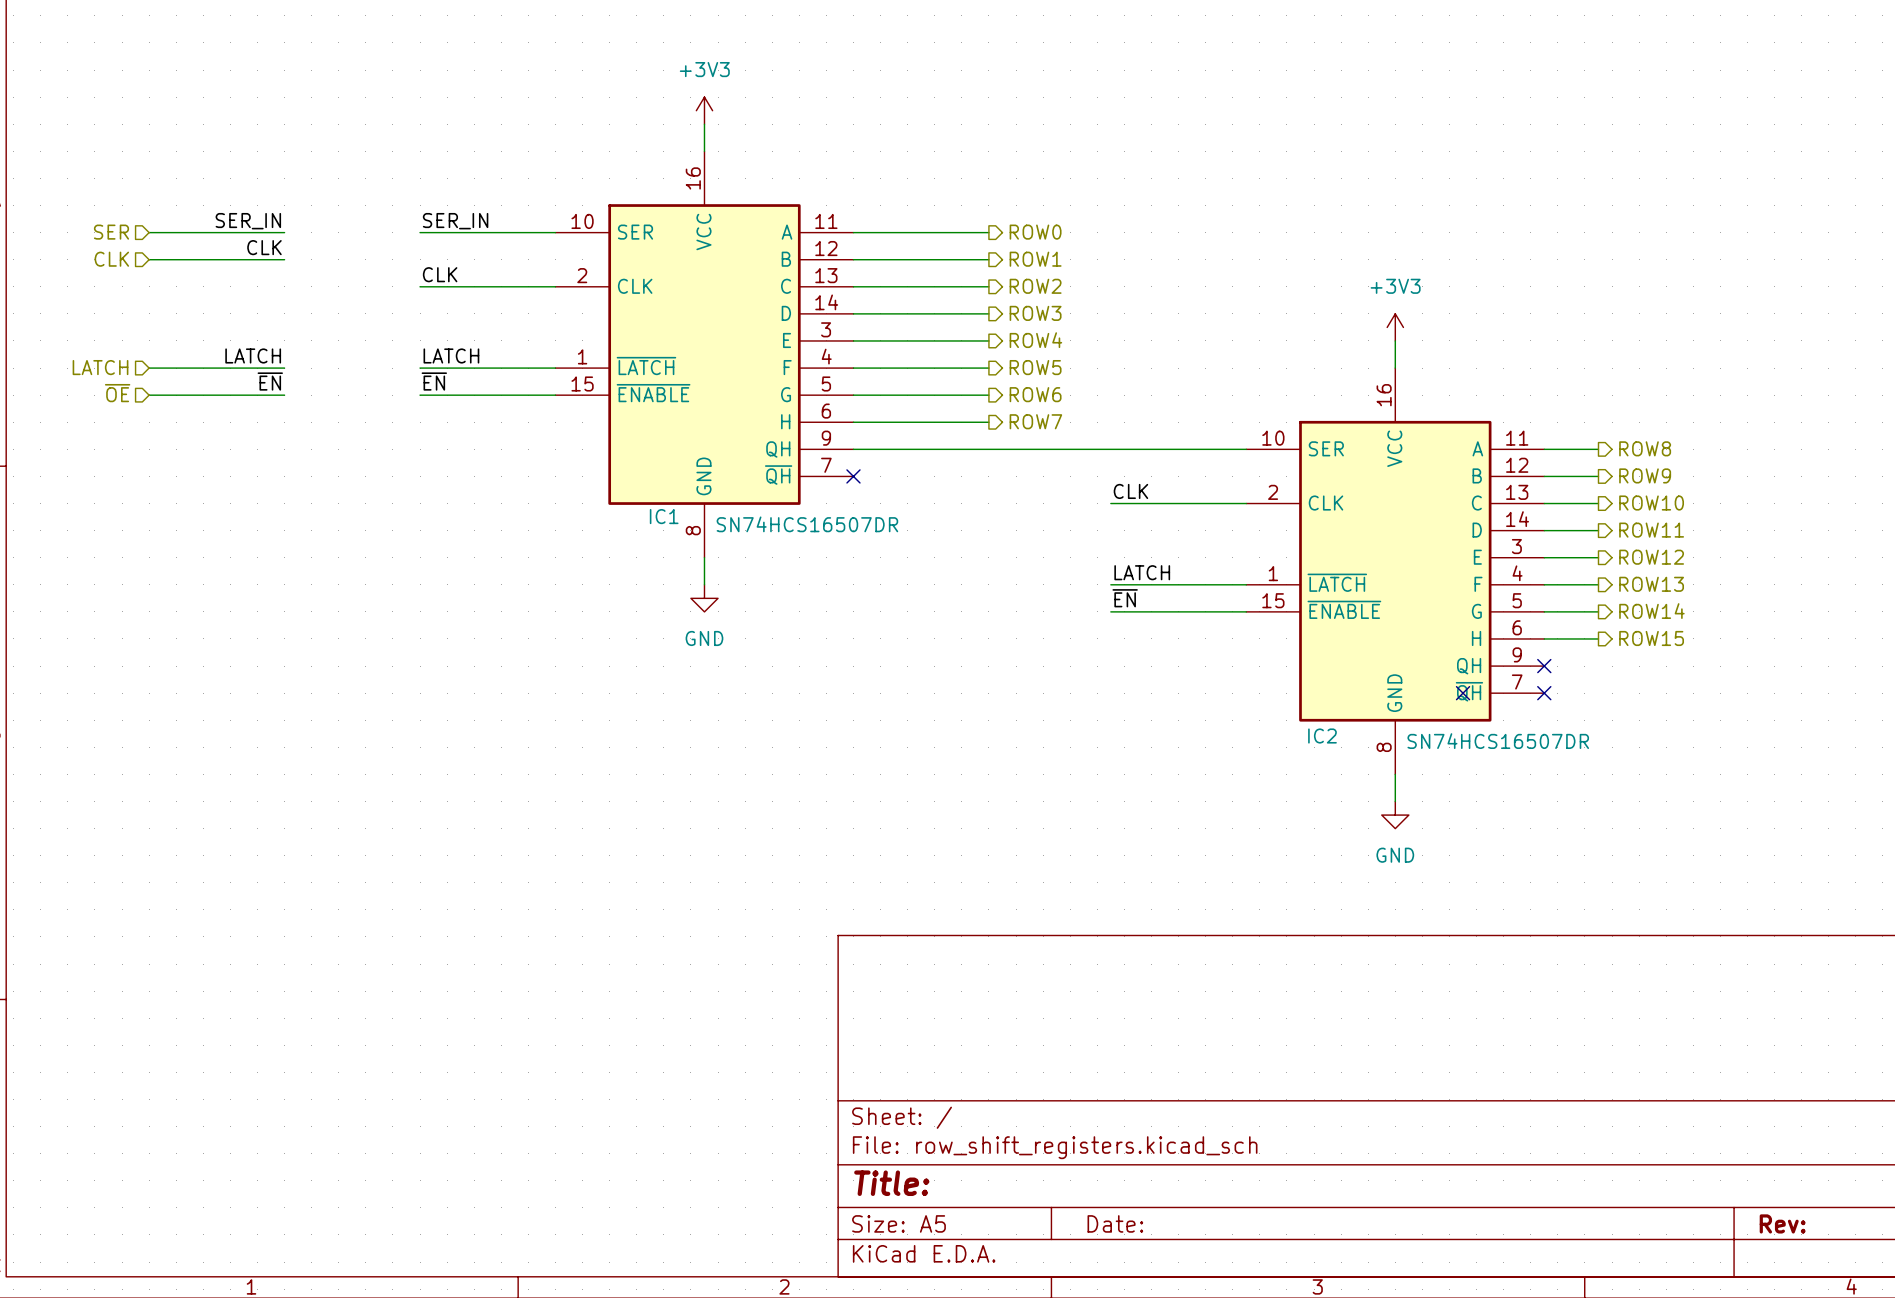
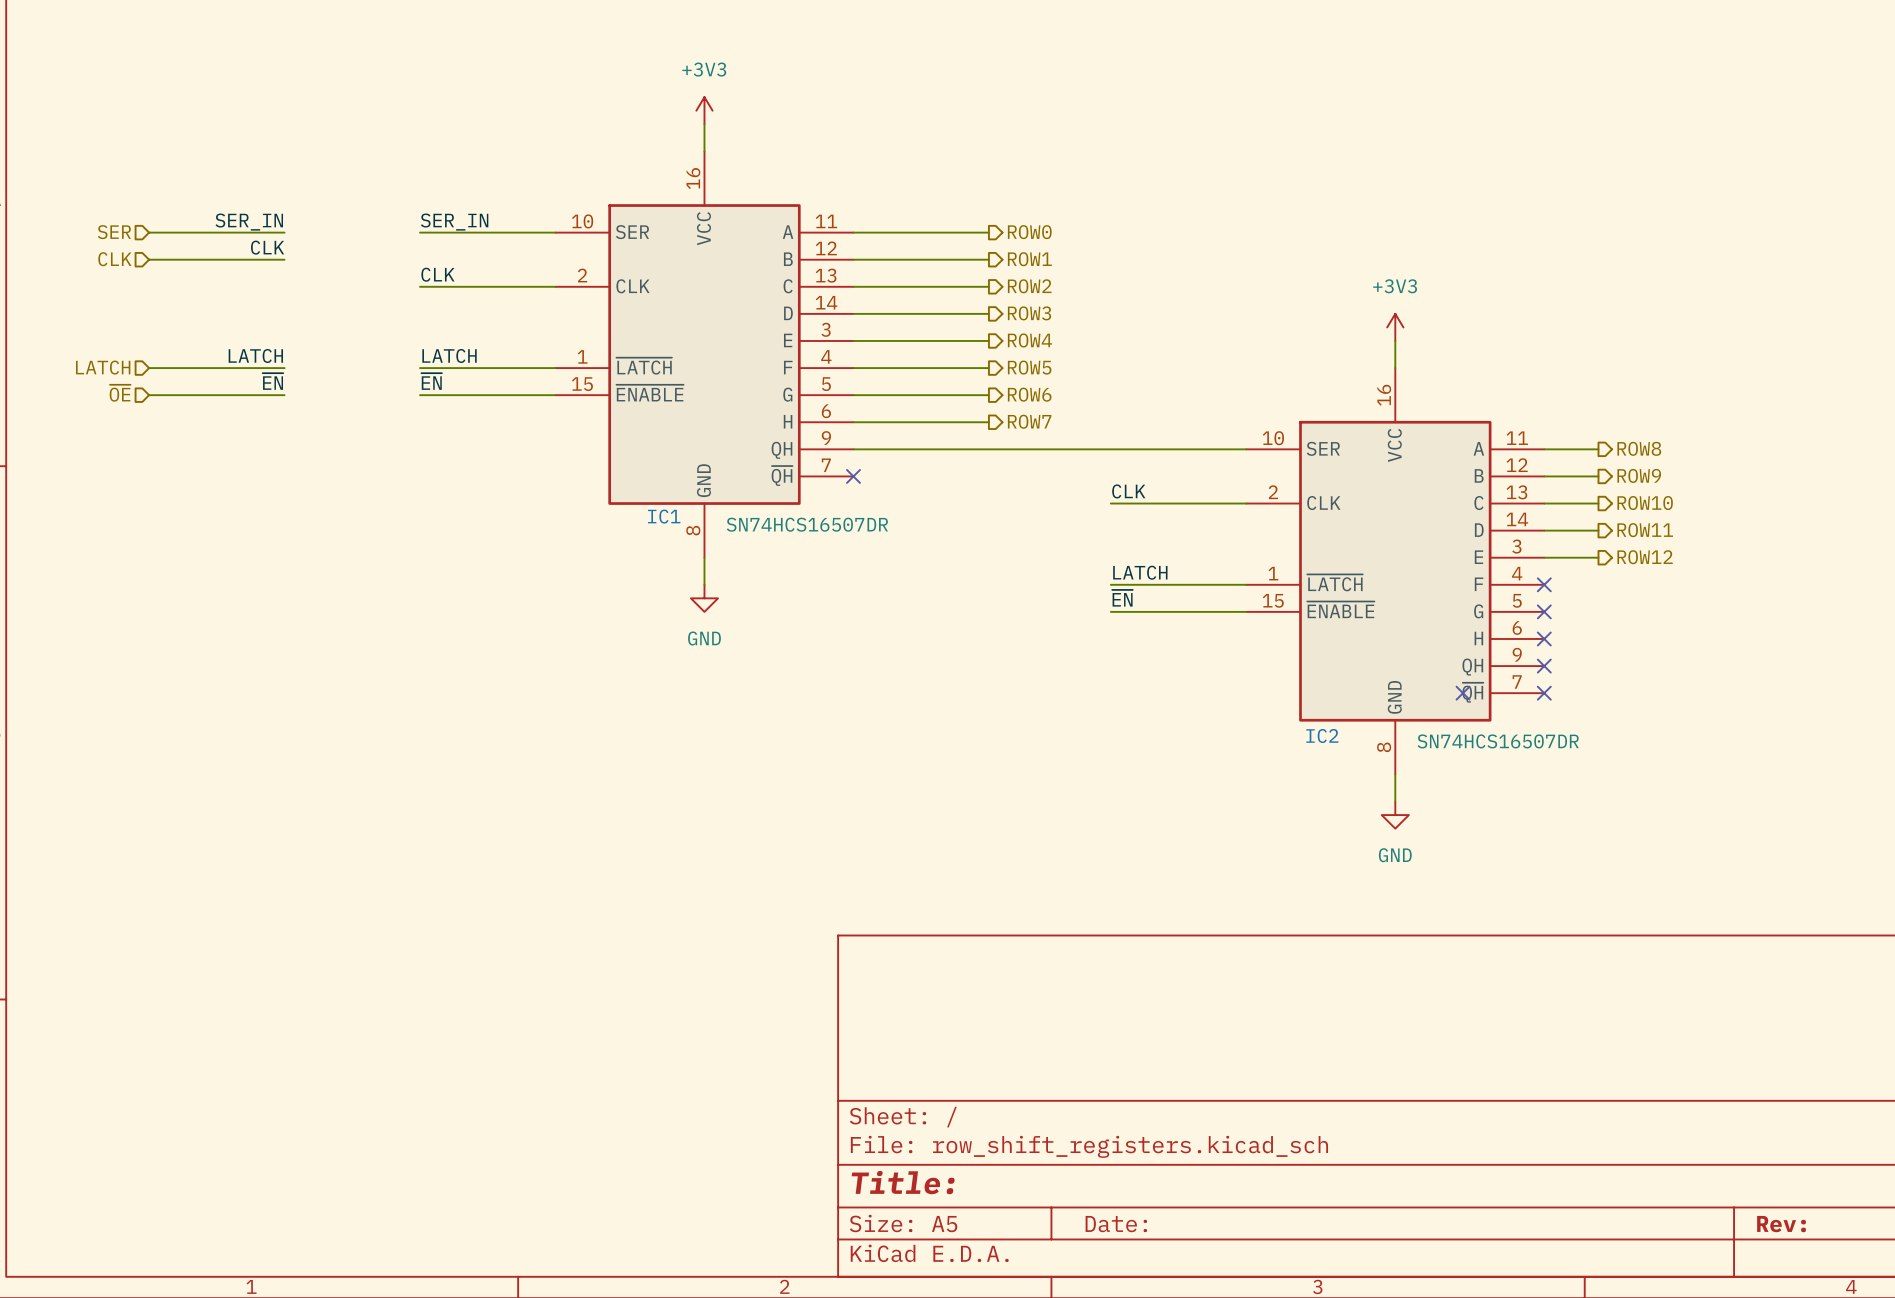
wire: (1544, 584) (1598, 584) -> none
no-connect mark: none -> (1544, 584)
hierarchical label: ROW13 (1651, 584) -> none
wire: (1544, 611) (1598, 611) -> none
no-connect mark: none -> (1544, 611)
hierarchical label: ROW14 (1651, 611) -> none
wire: (1544, 638) (1598, 638) -> none
no-connect mark: none -> (1544, 638)
hierarchical label: ROW15 (1651, 638) -> none

